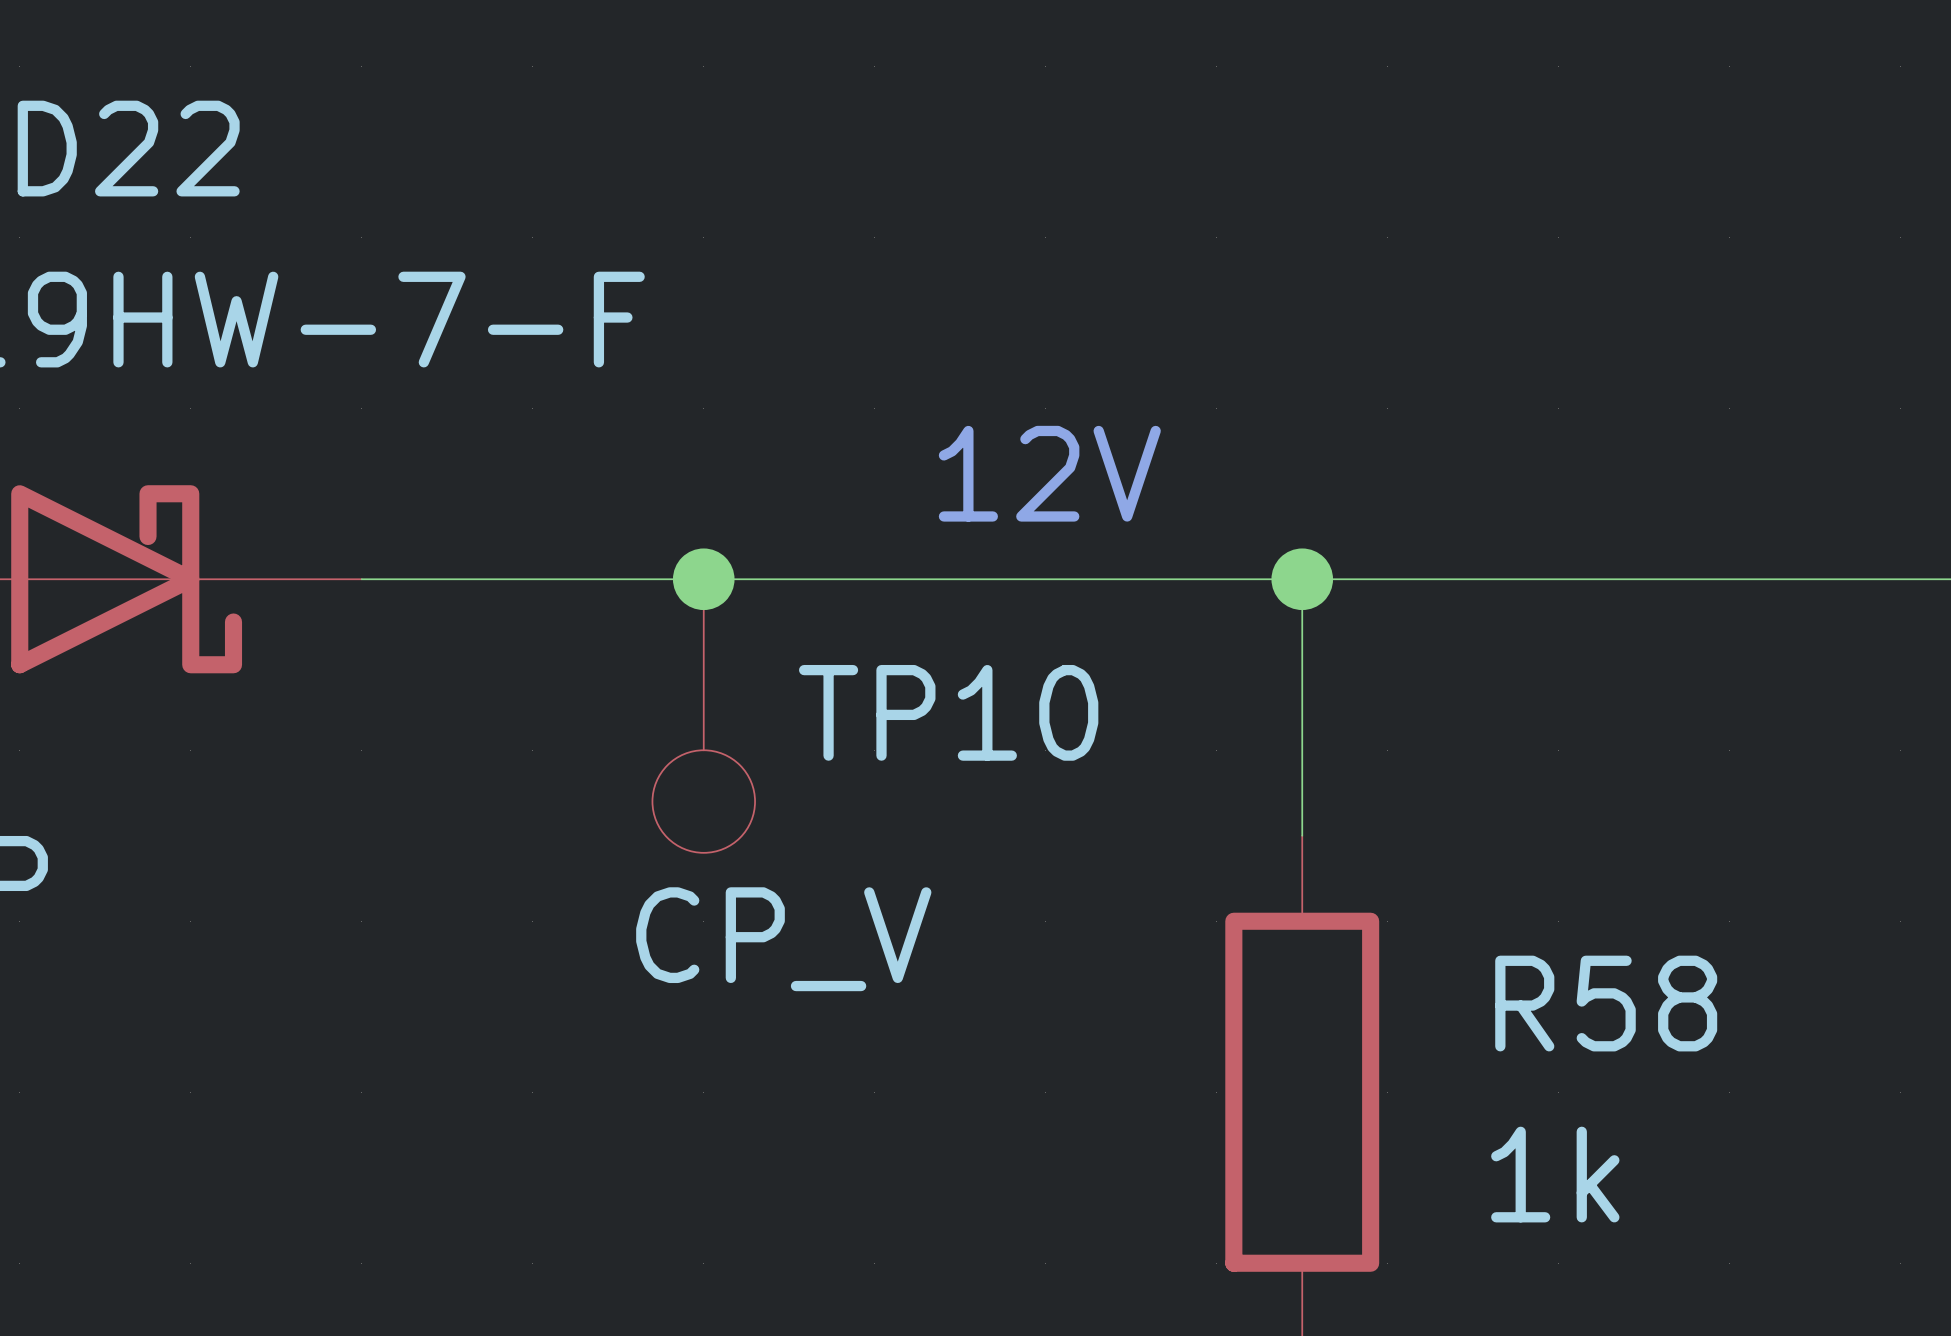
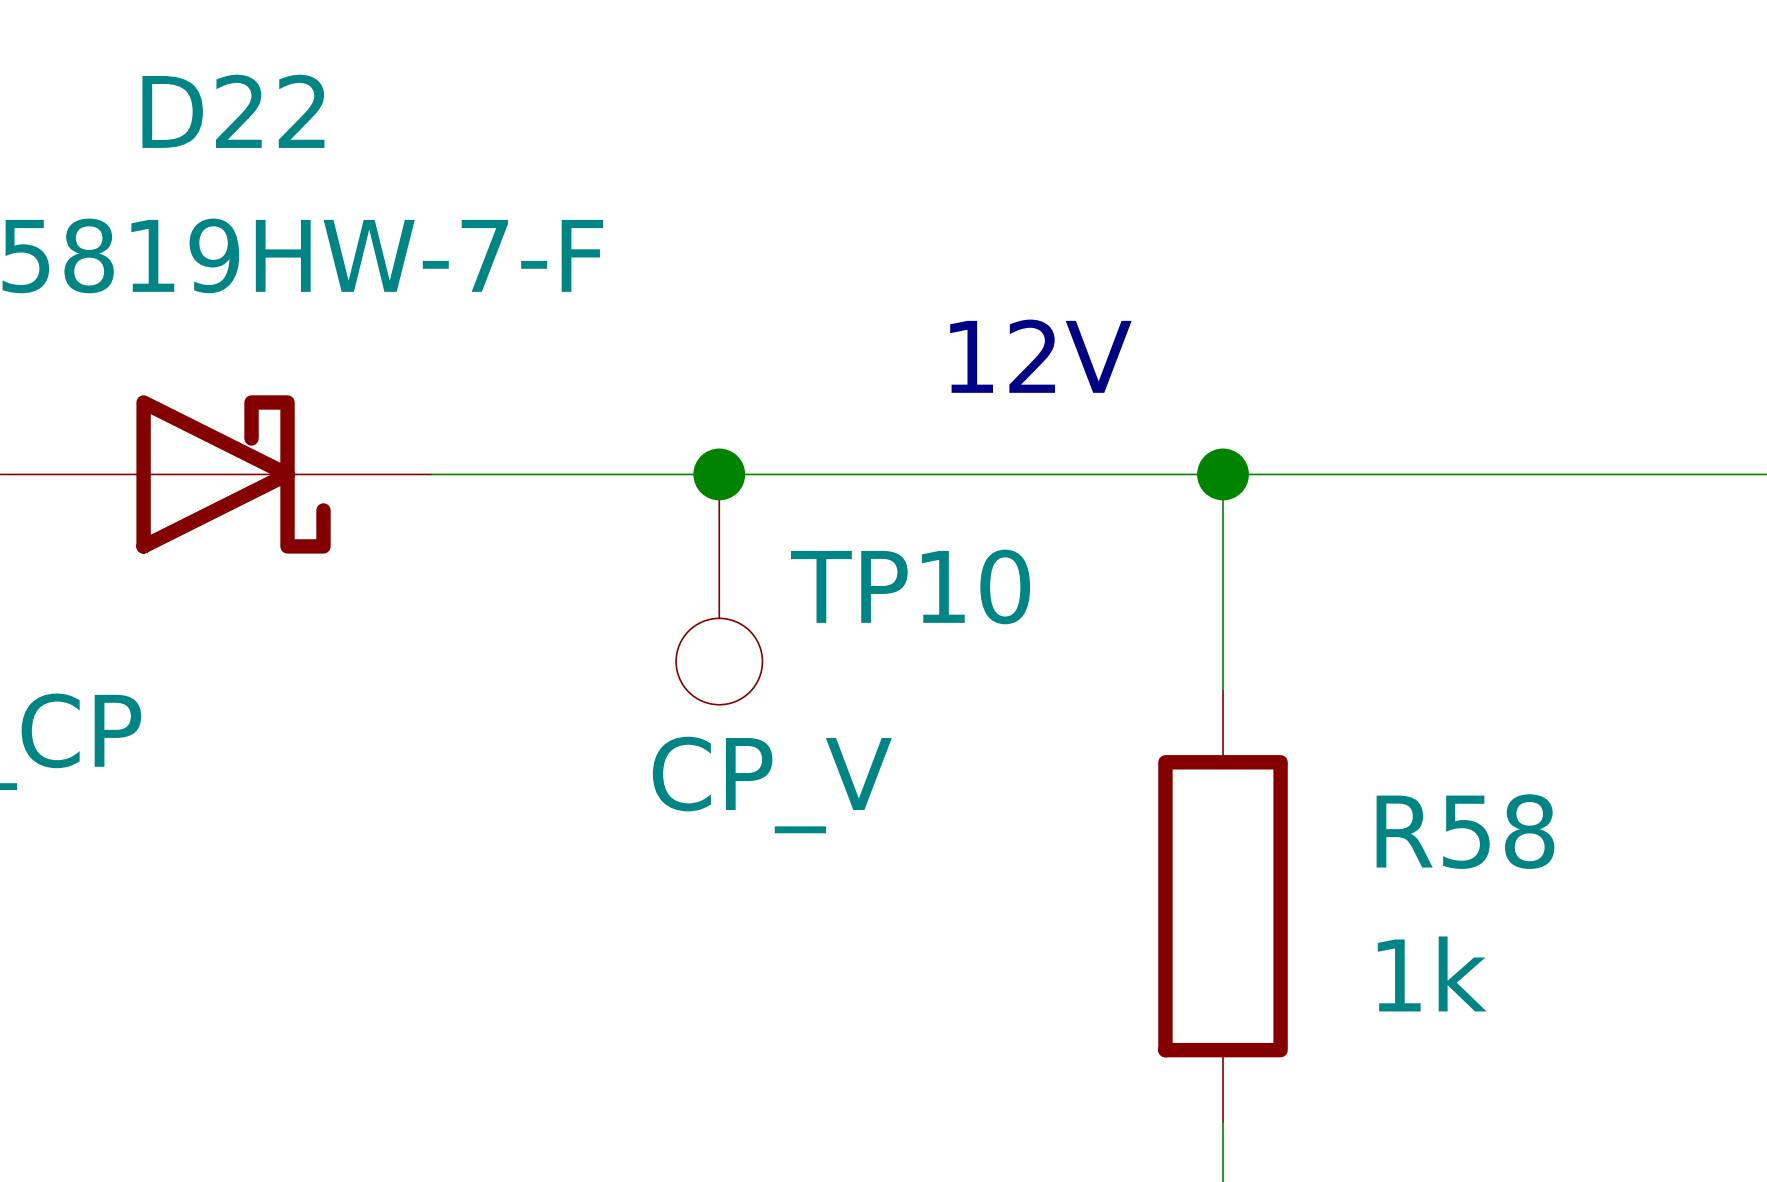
text position: 12V (1049, 473) -> 12V (1040, 356)

